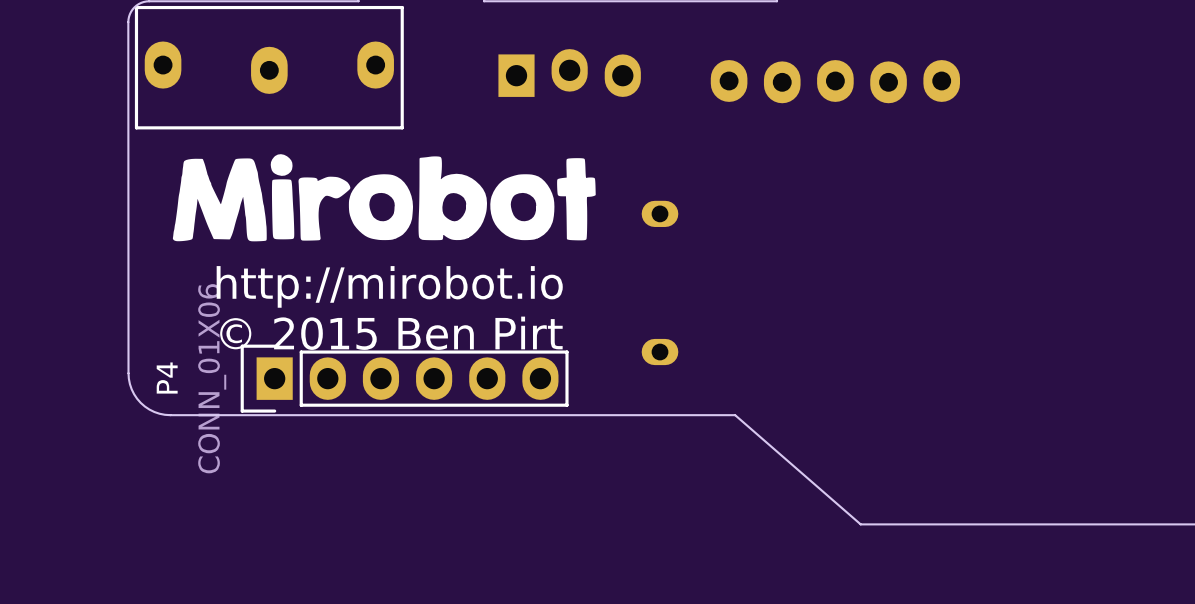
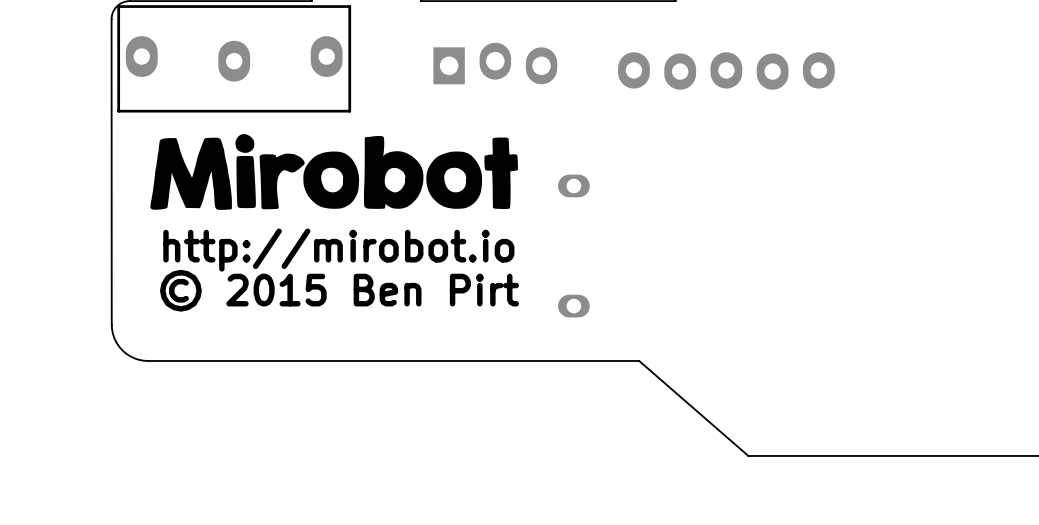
P4: CONN_01X06 (404, 378) -> none

